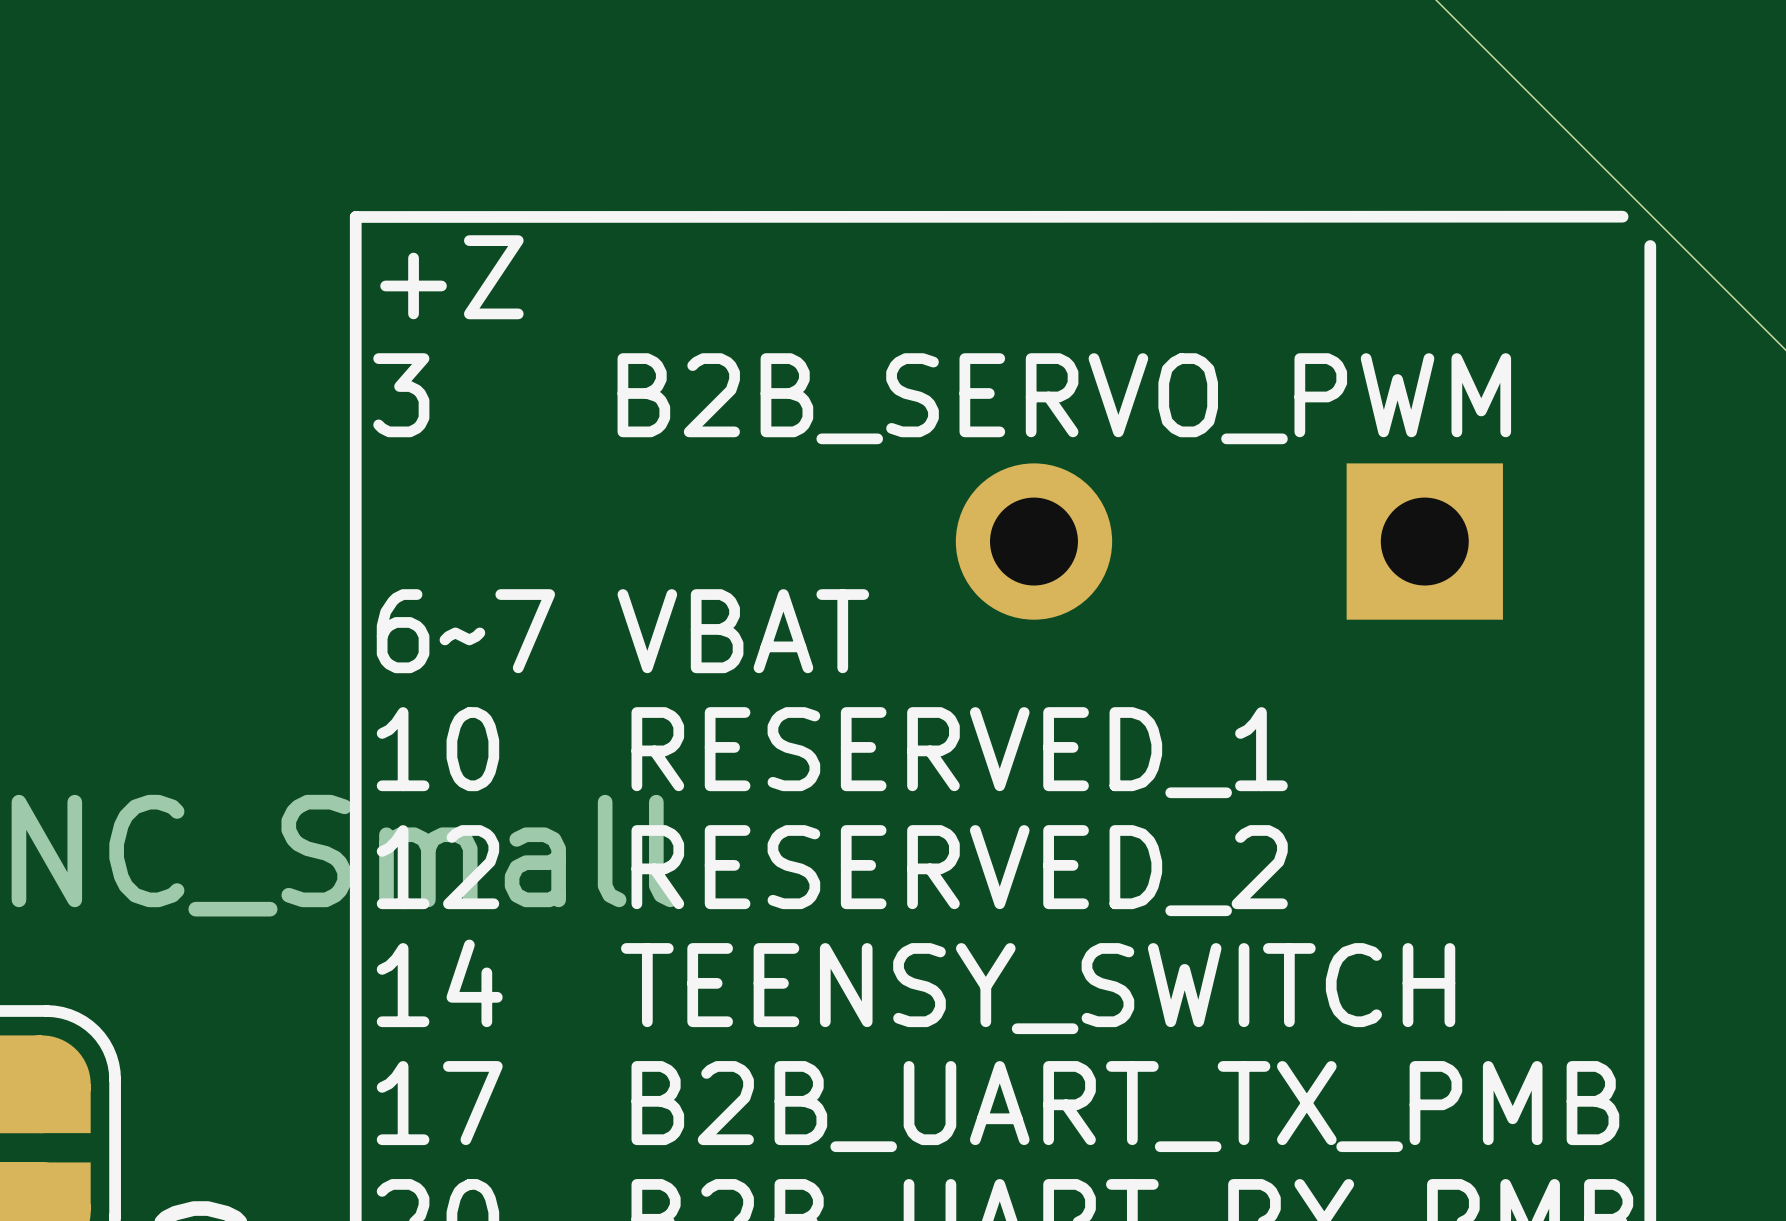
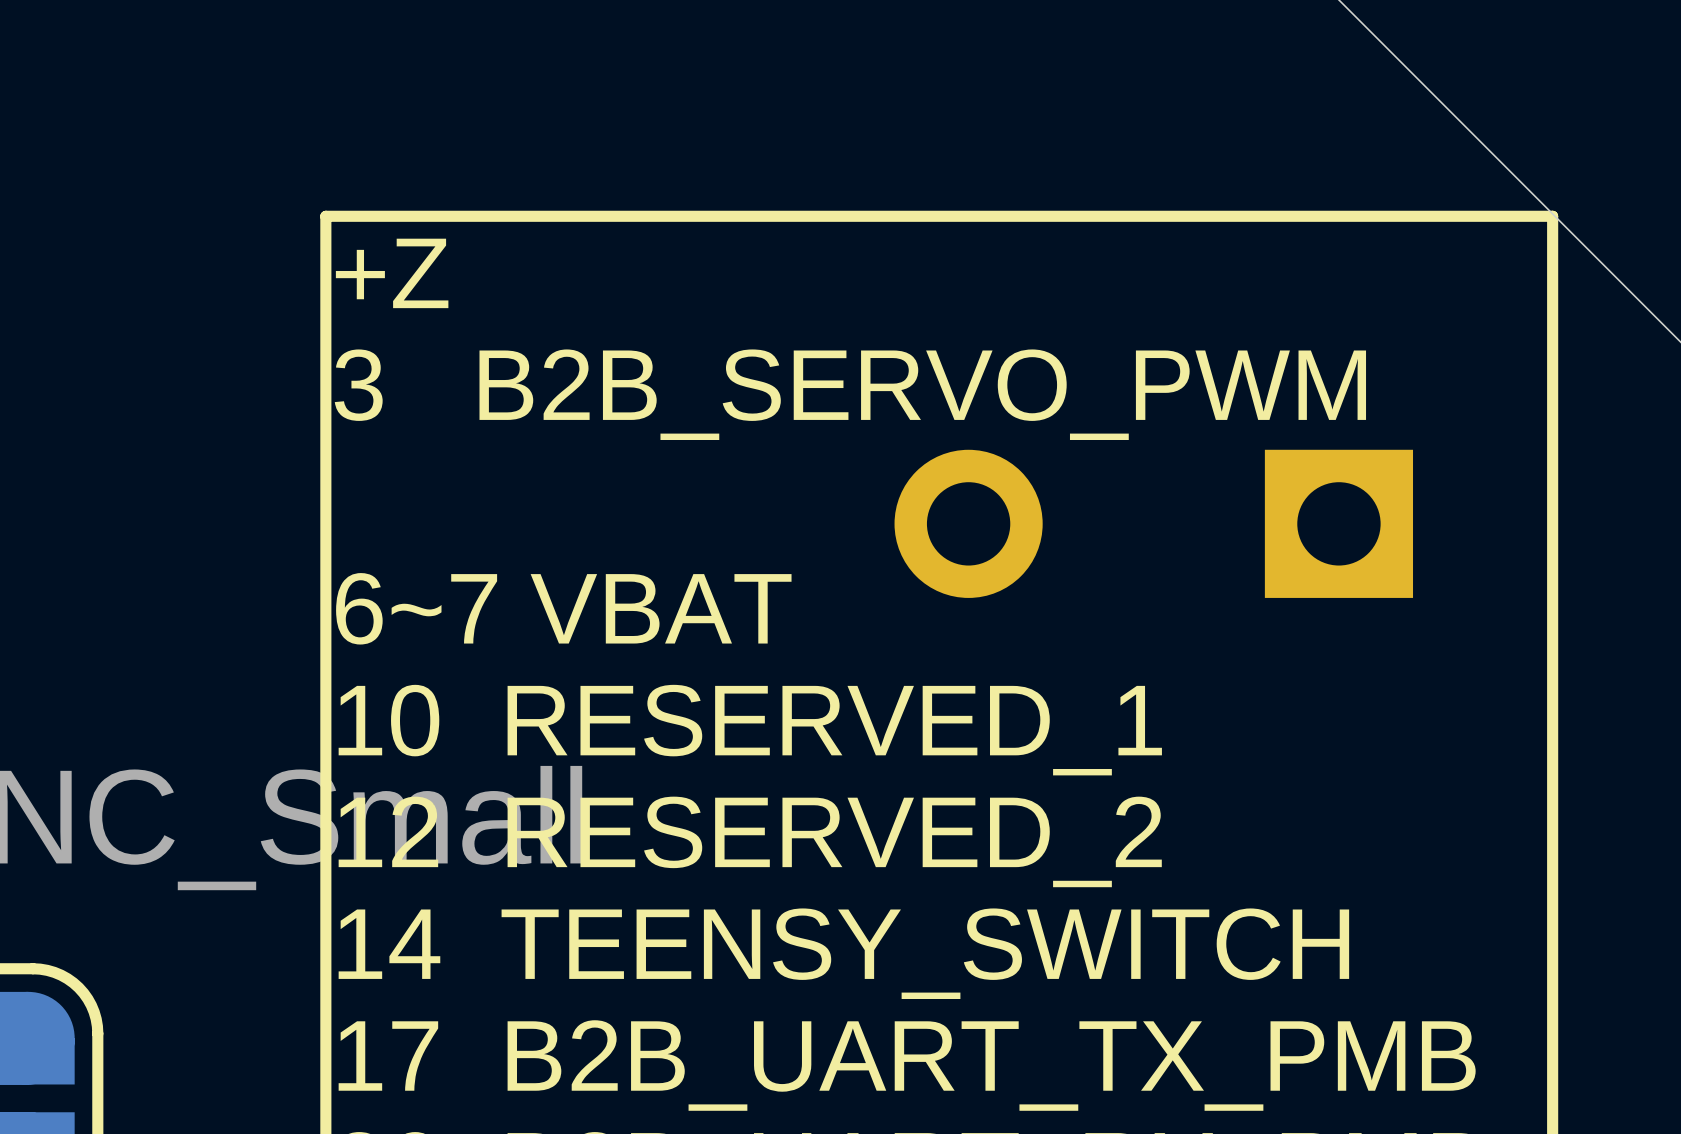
line: (1622, 216) (355, 216) -> (1552, 243) (1552, 216) (325, 216)

